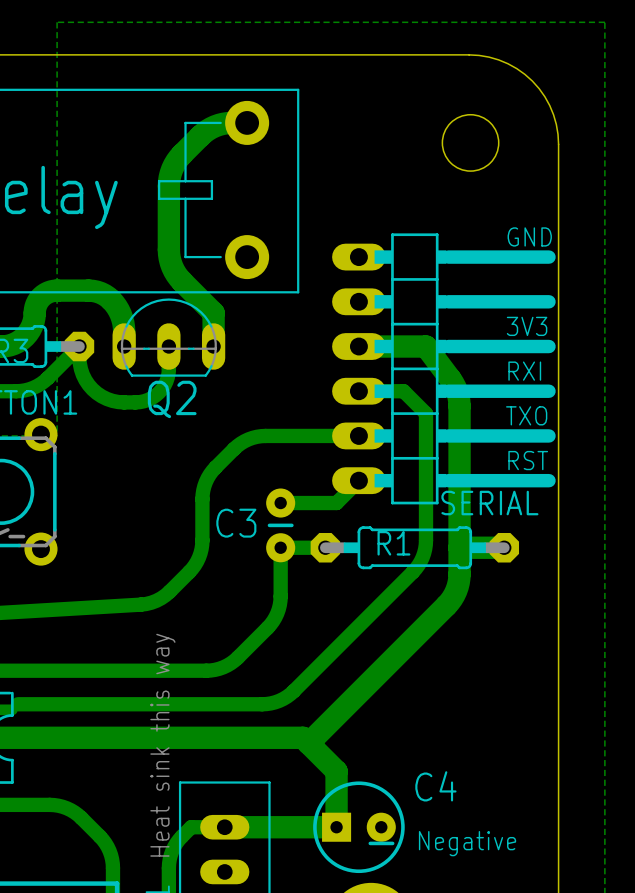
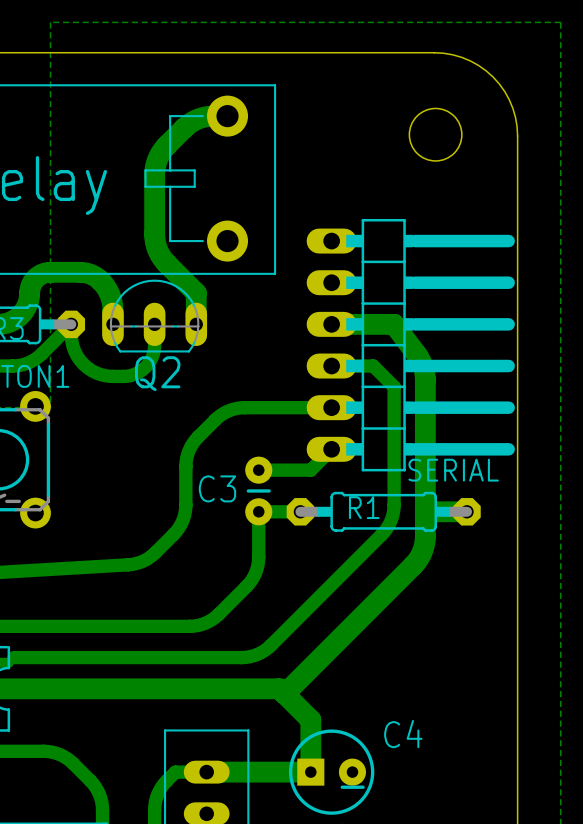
text: GND (529, 236) -> none
text: 3V3 (527, 326) -> none
text: RXI (524, 371) -> none
text: TXO (526, 415) -> none
text: RST (528, 460) -> none
text: Heat sink this way (162, 745) -> none
text: Negative (467, 843) -> none

